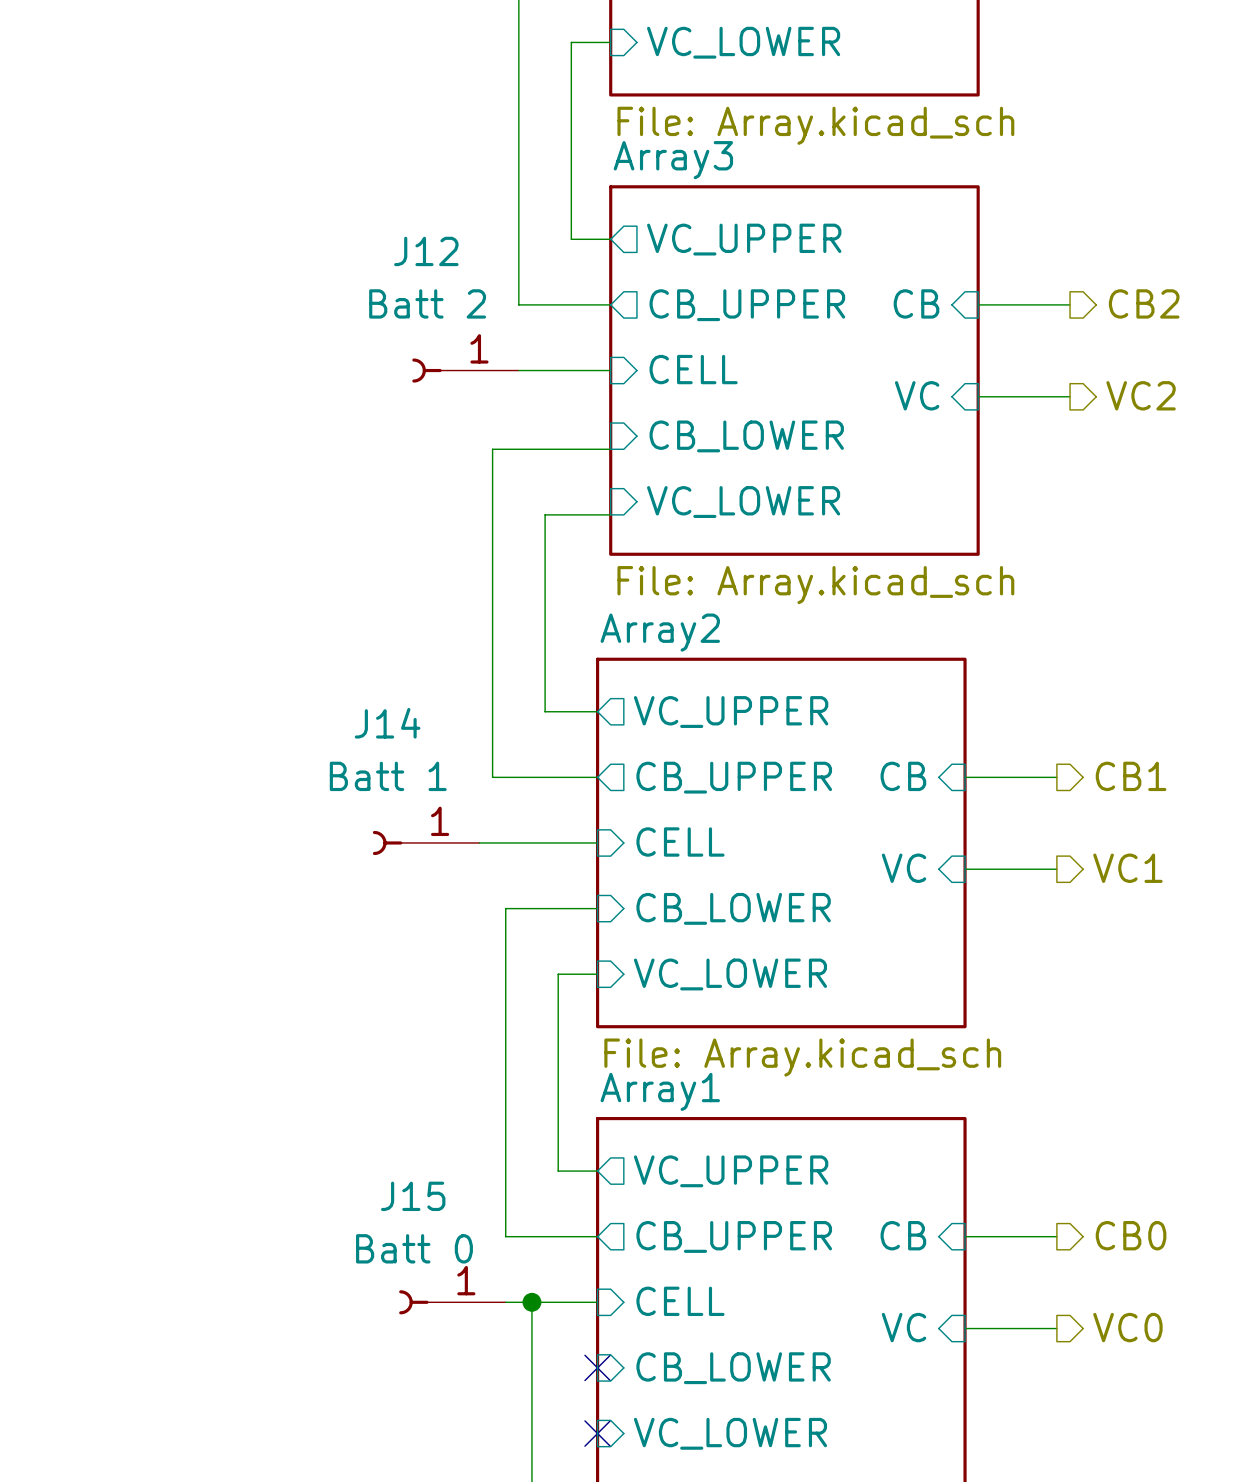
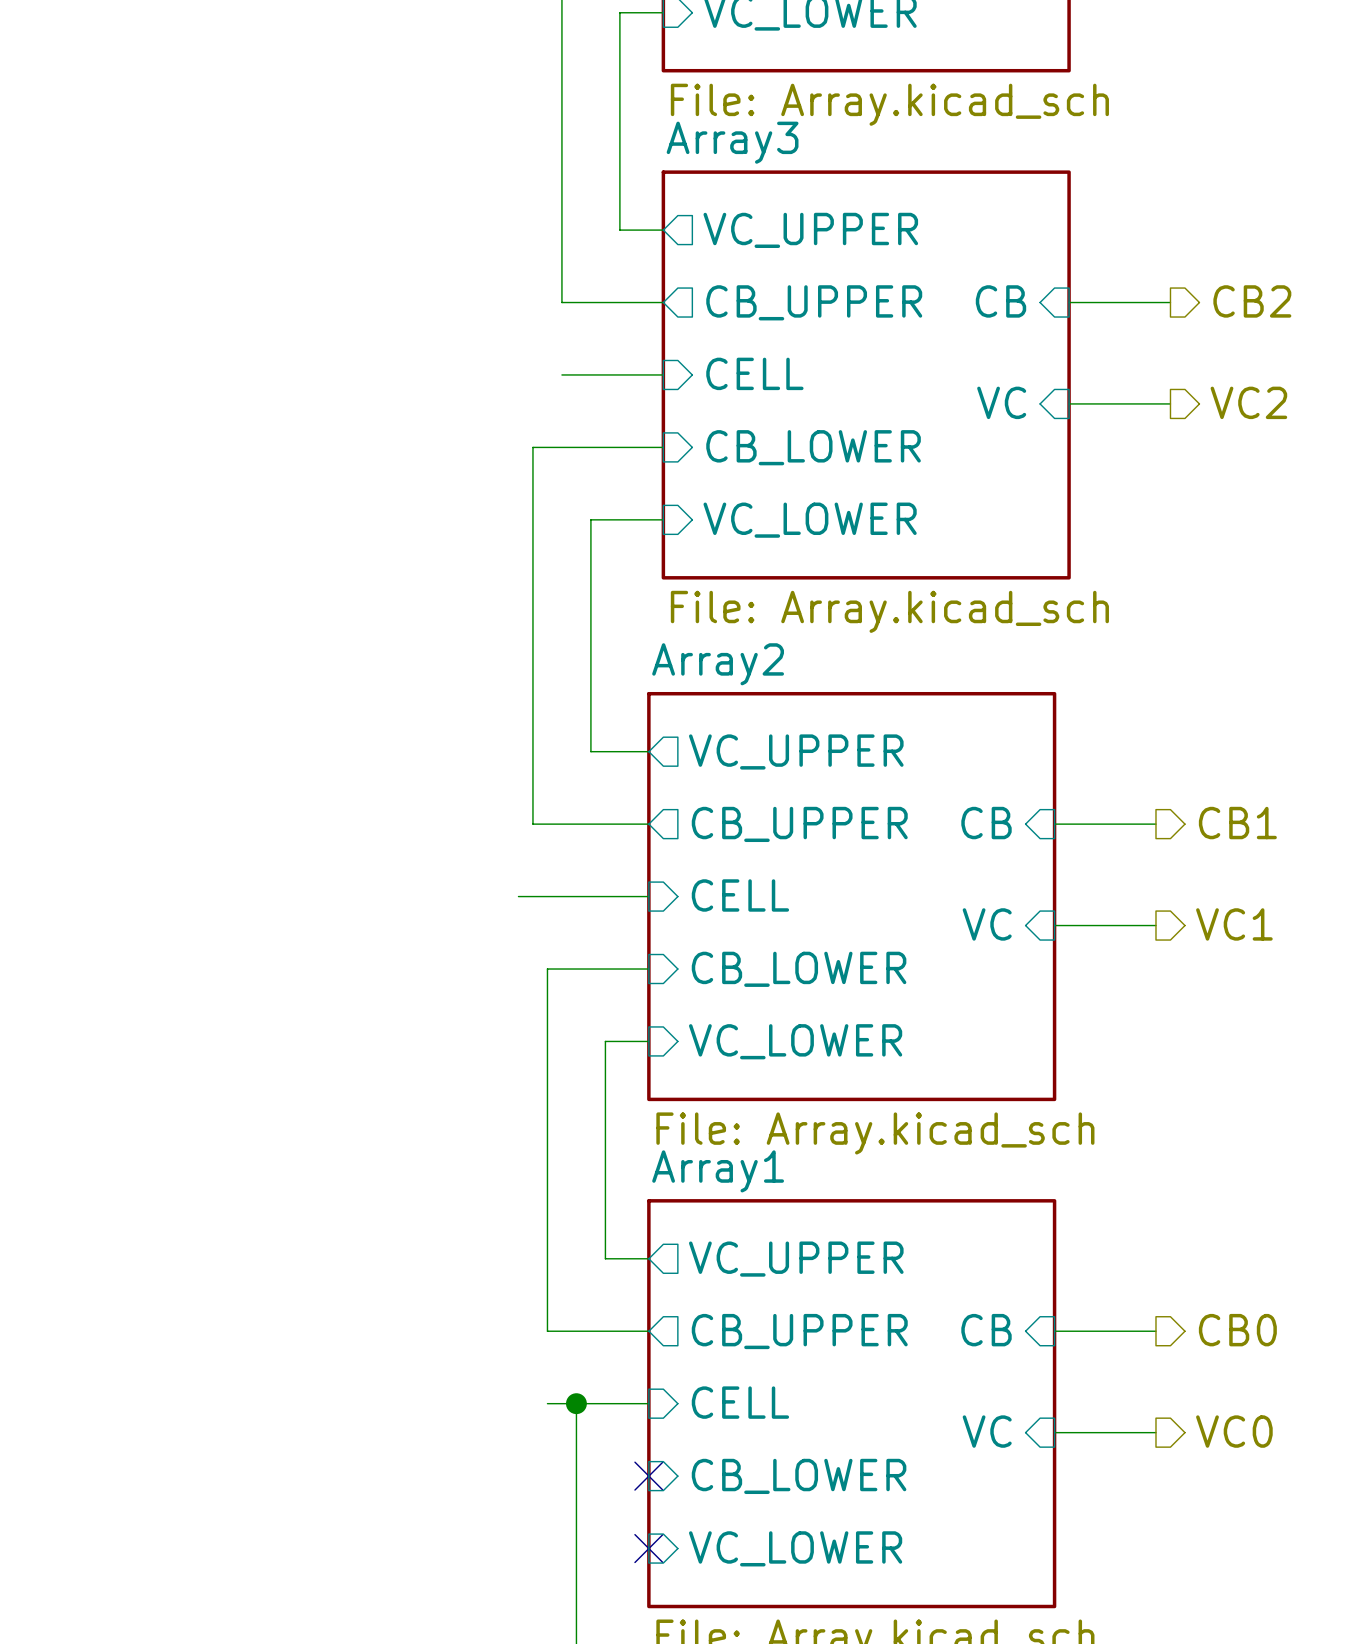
J12: Batt 2 (465, 370) -> none
wire: (492, 449) (610, 449) -> (532, 461) (532, 447) (663, 447)
wire: (545, 514) (610, 514) -> (590, 534) (590, 519) (663, 519)
J14: Batt 1 (426, 842) -> none
J15: Batt 0 (452, 1302) -> none

